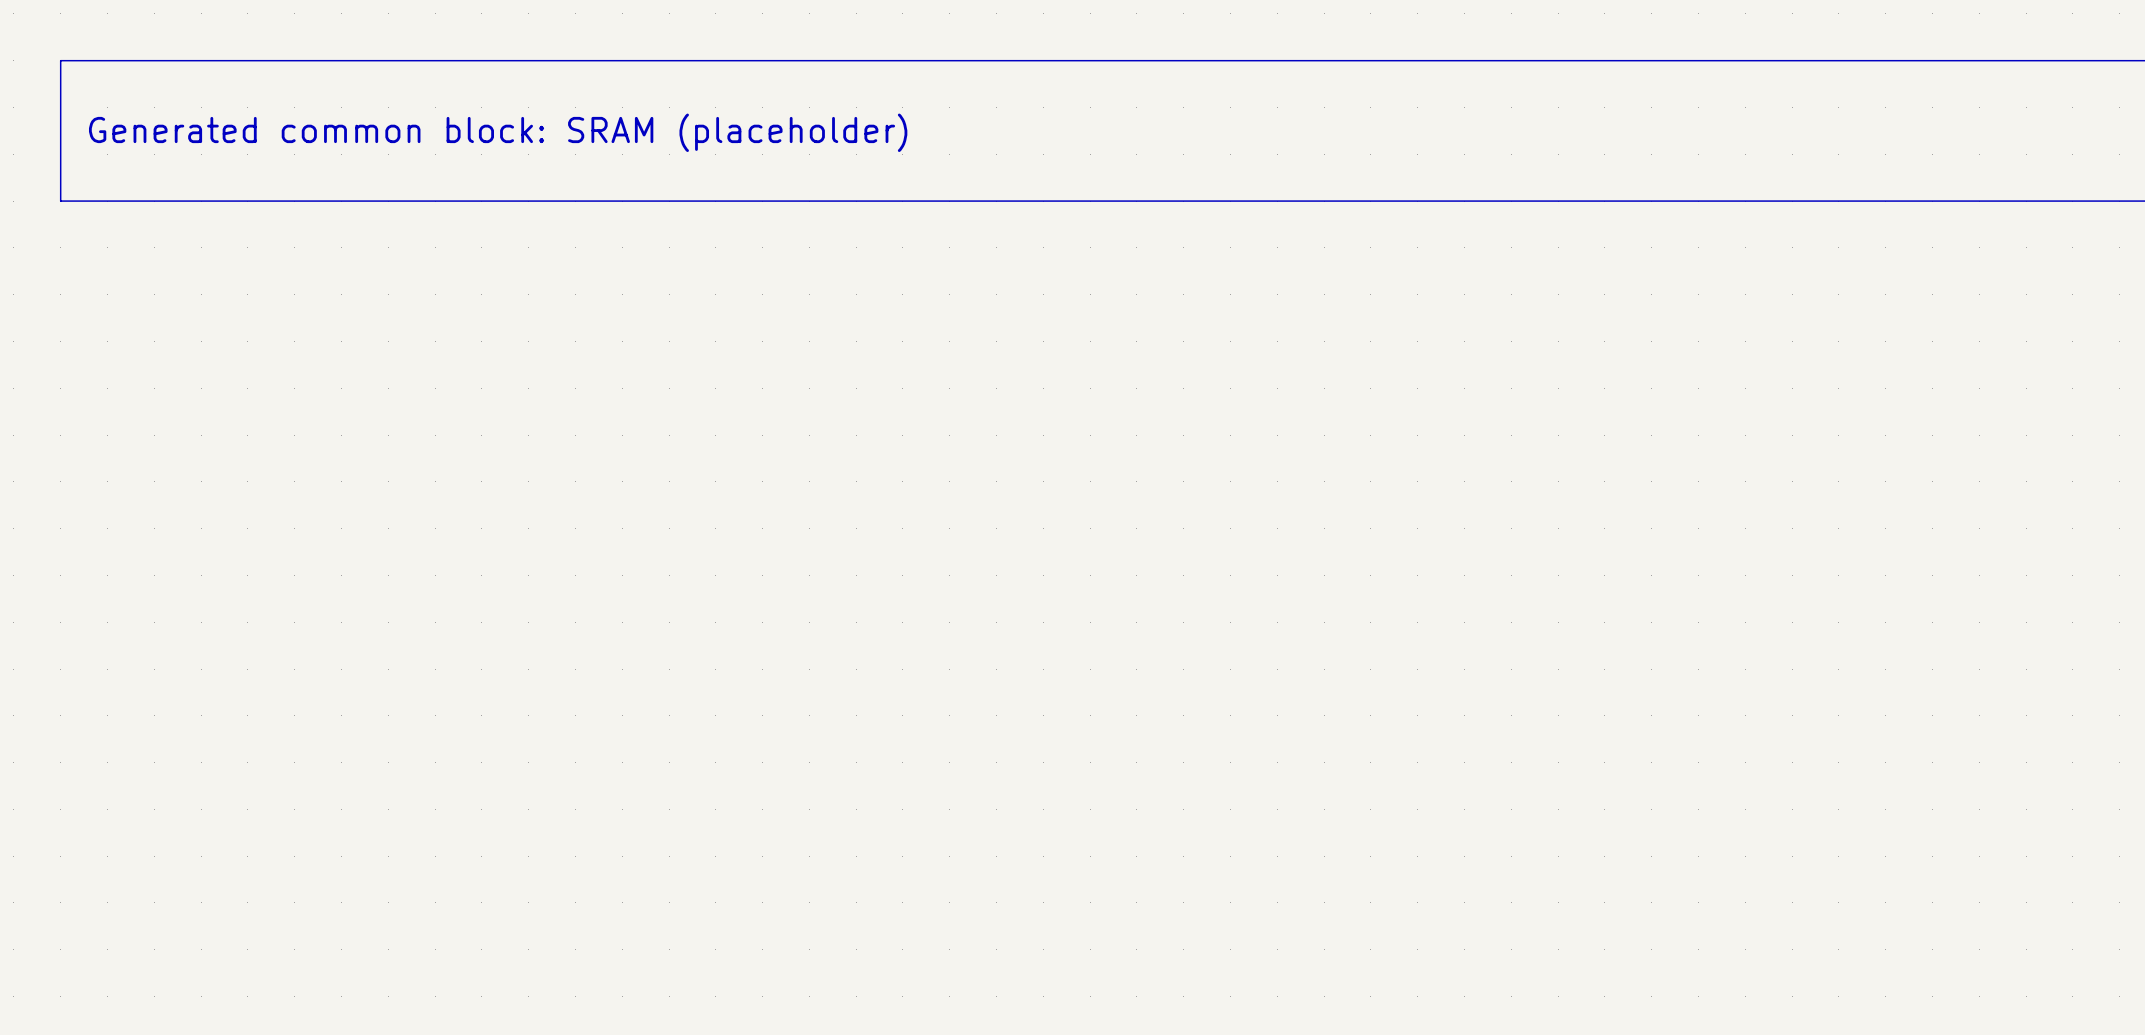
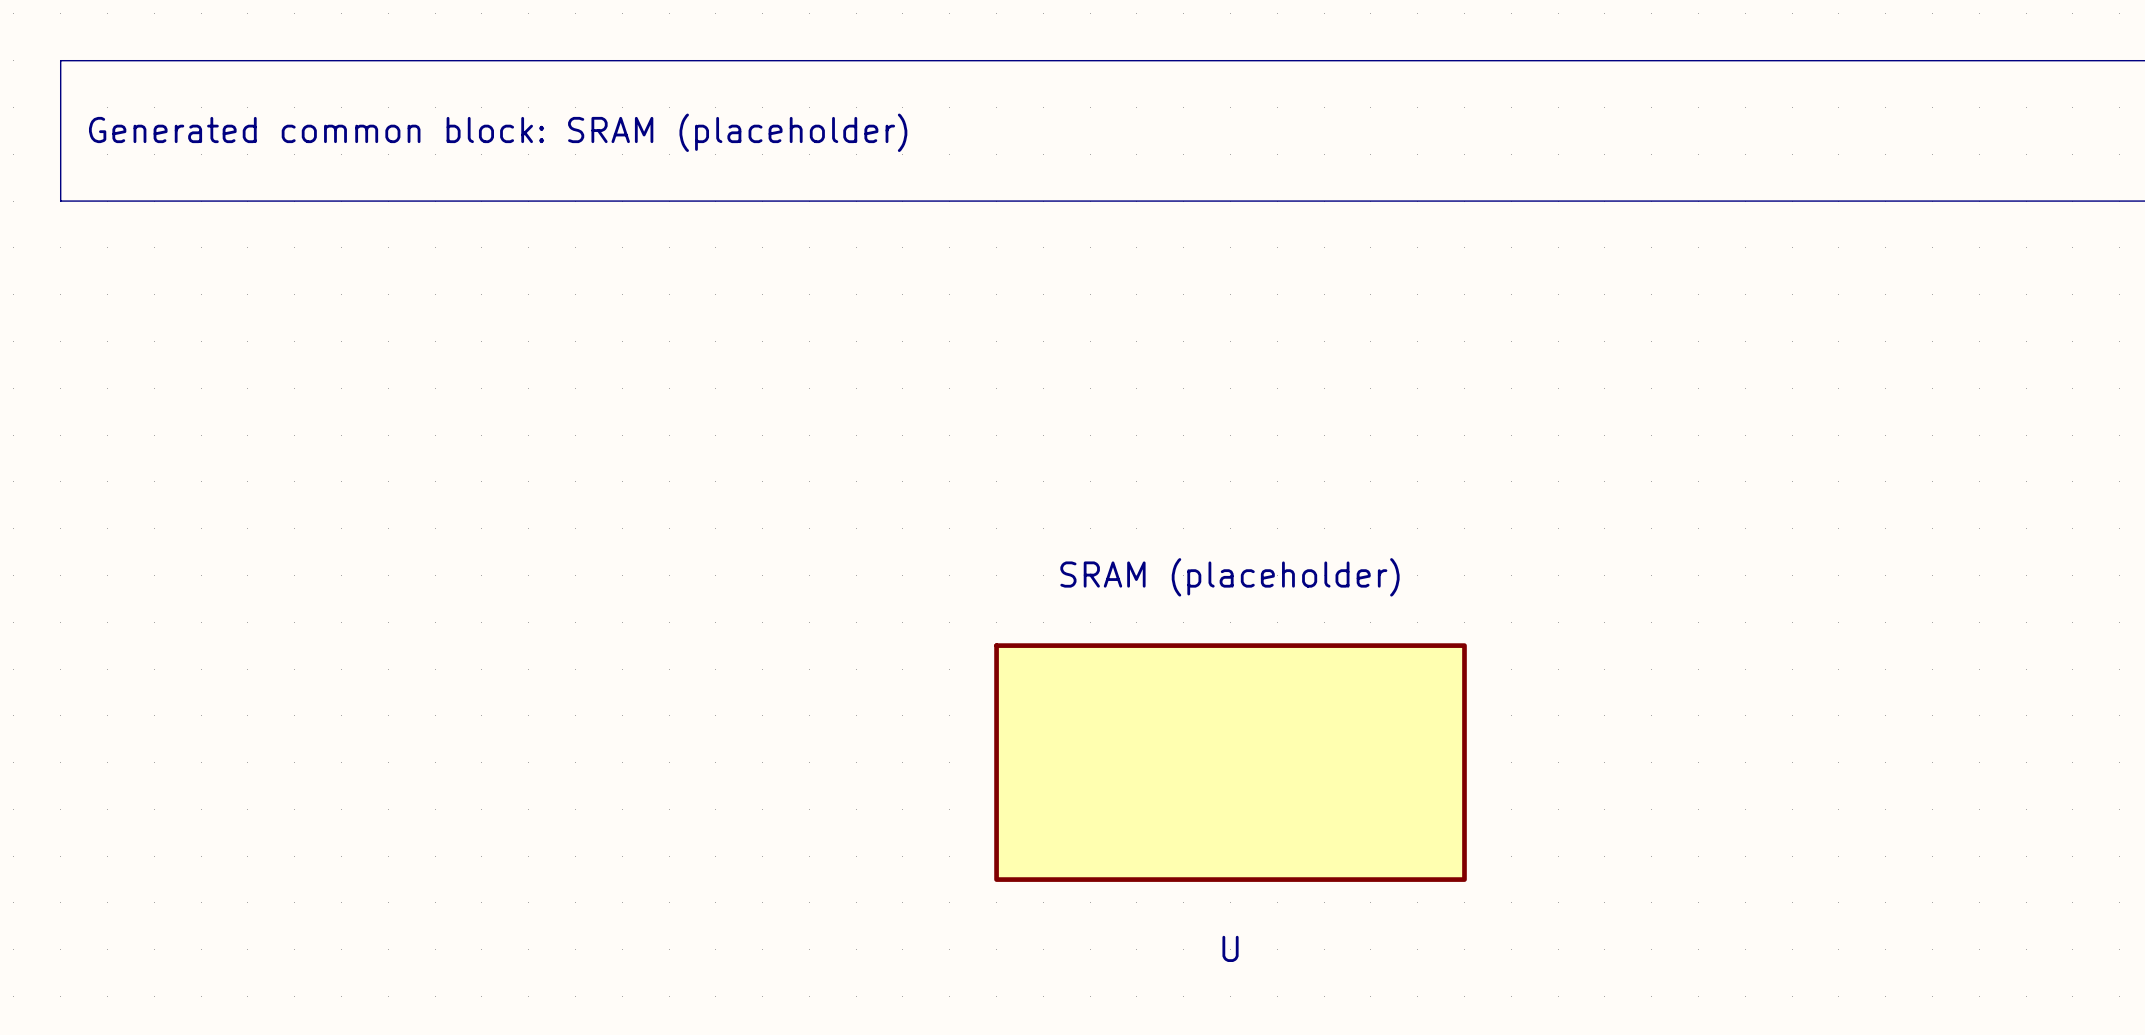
U: none -> SRAM (placeholder) (1230, 762)

